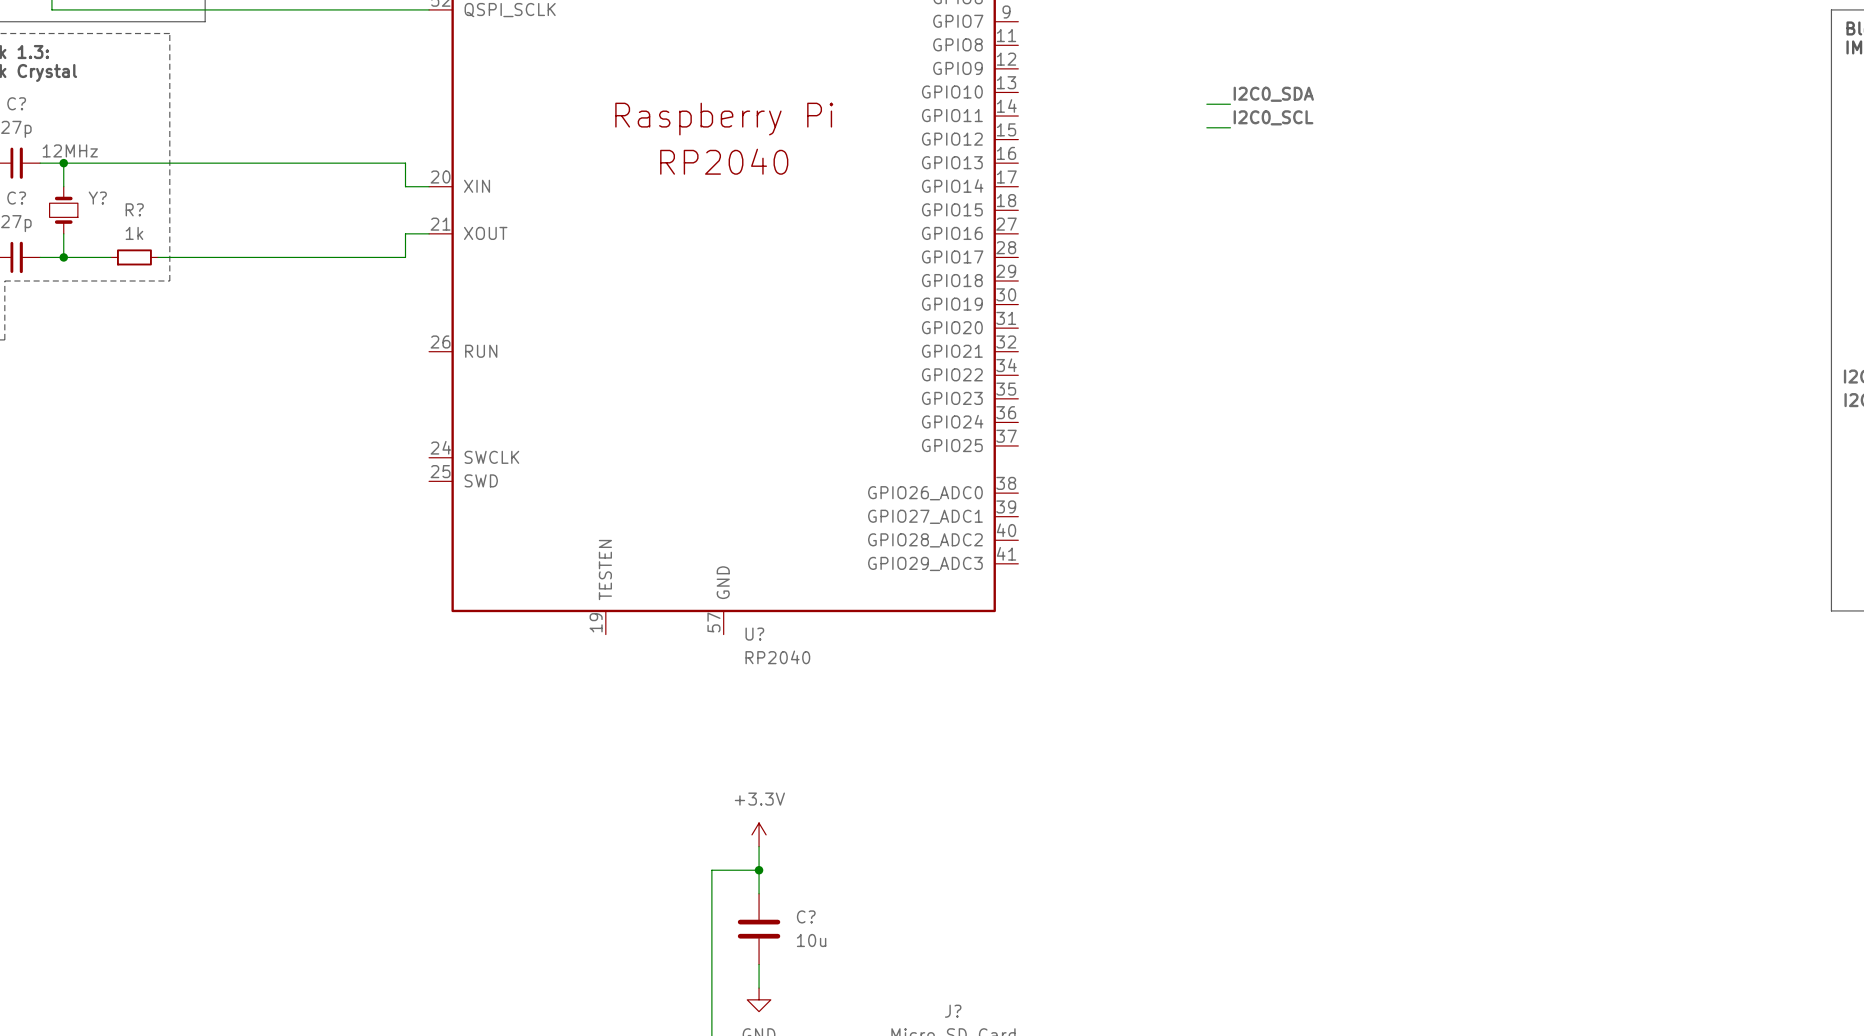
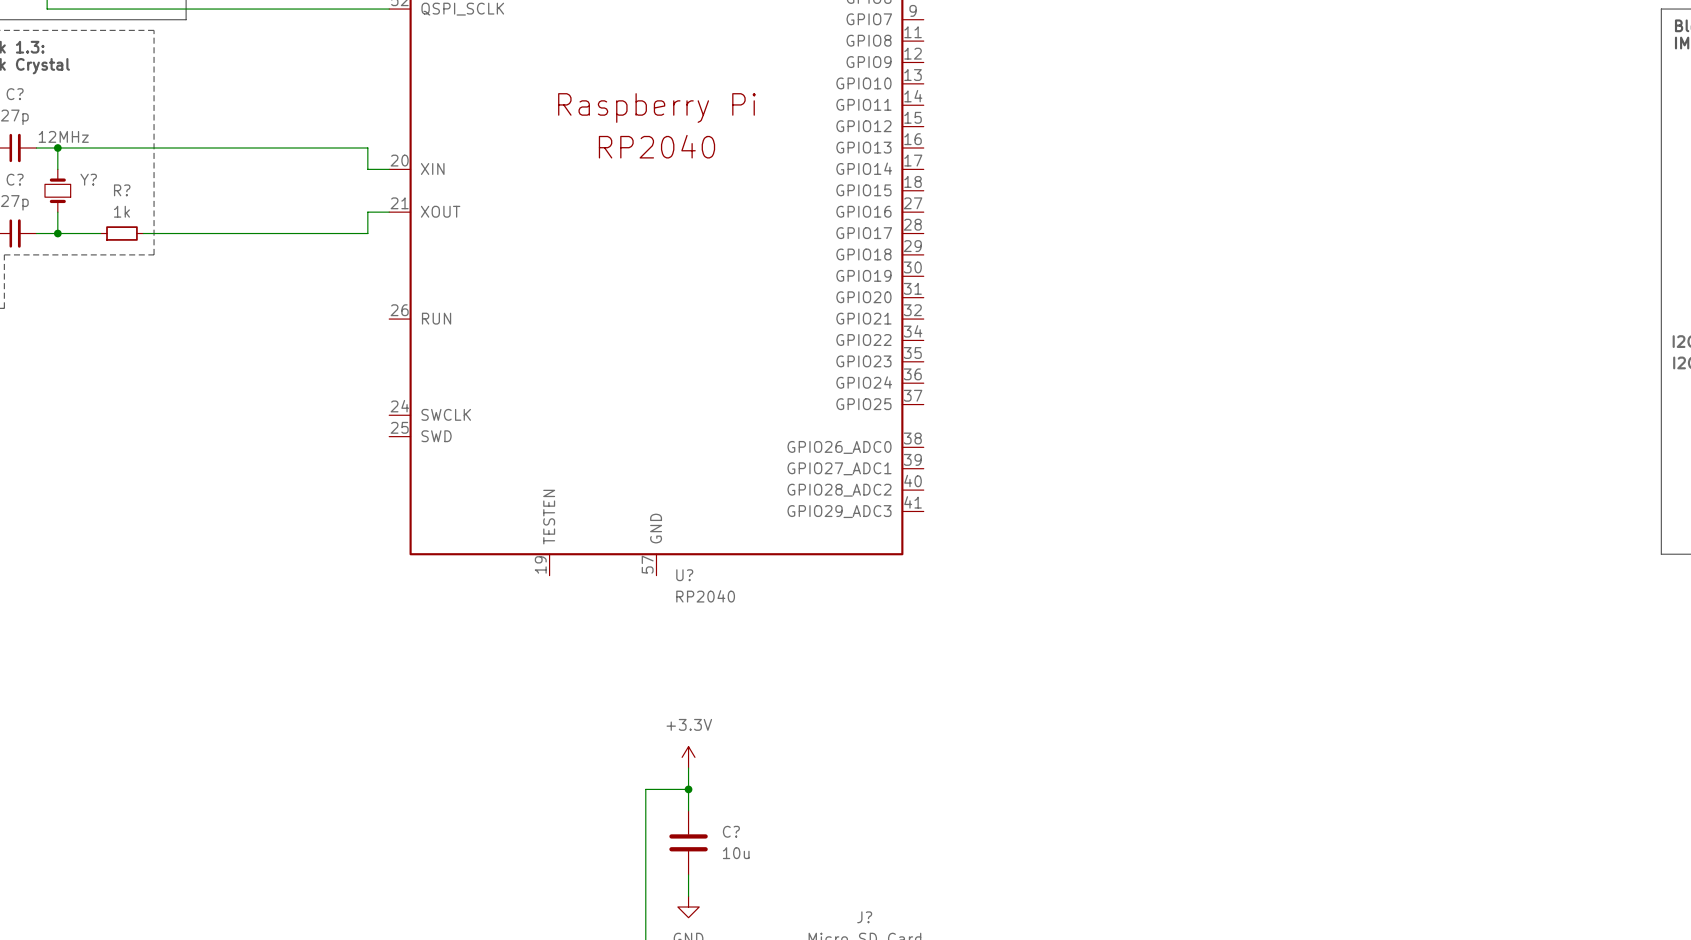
label: I2C0_SDA (1273, 94) -> none
wire: (1206, 104) (1230, 104) -> none
label: I2C0_SCL (1273, 117) -> none
wire: (1206, 127) (1230, 127) -> none

